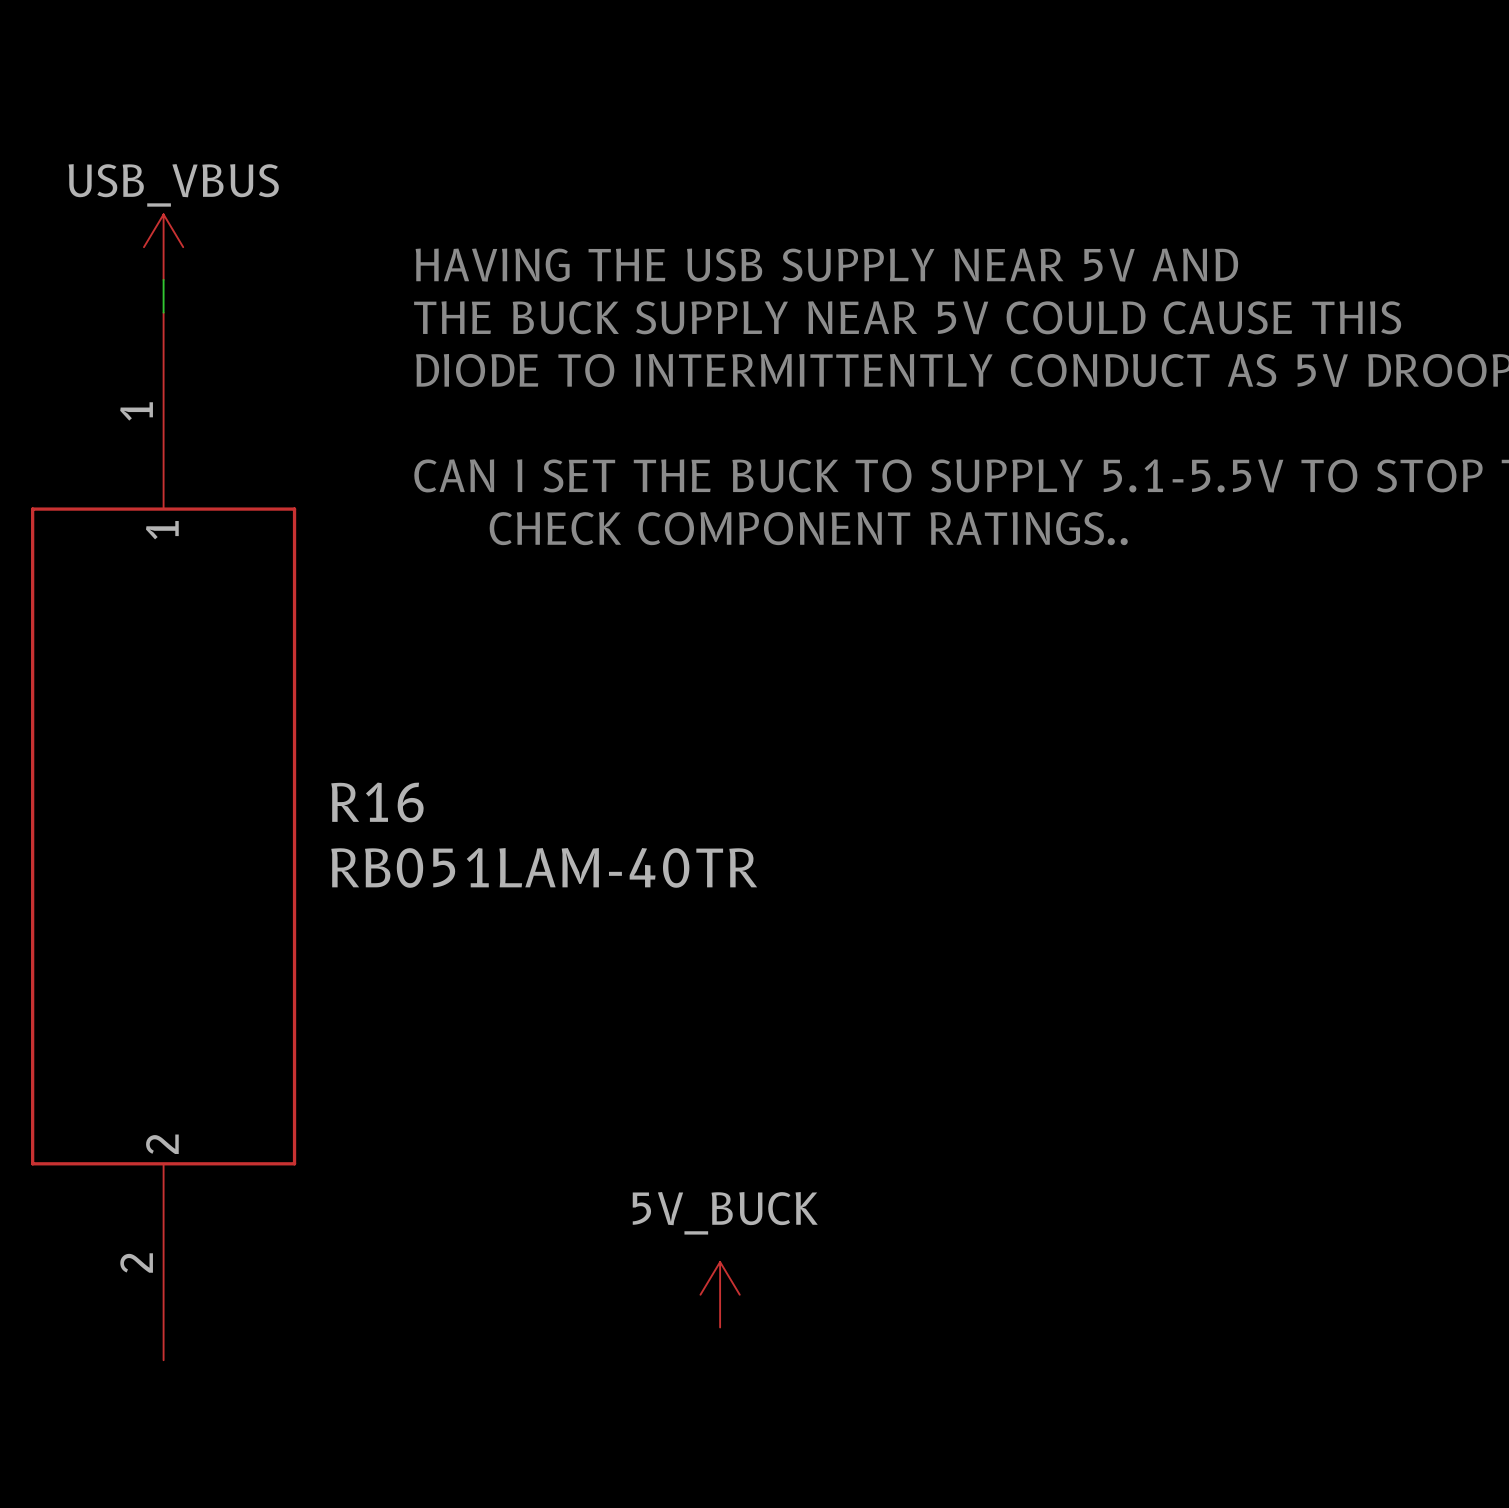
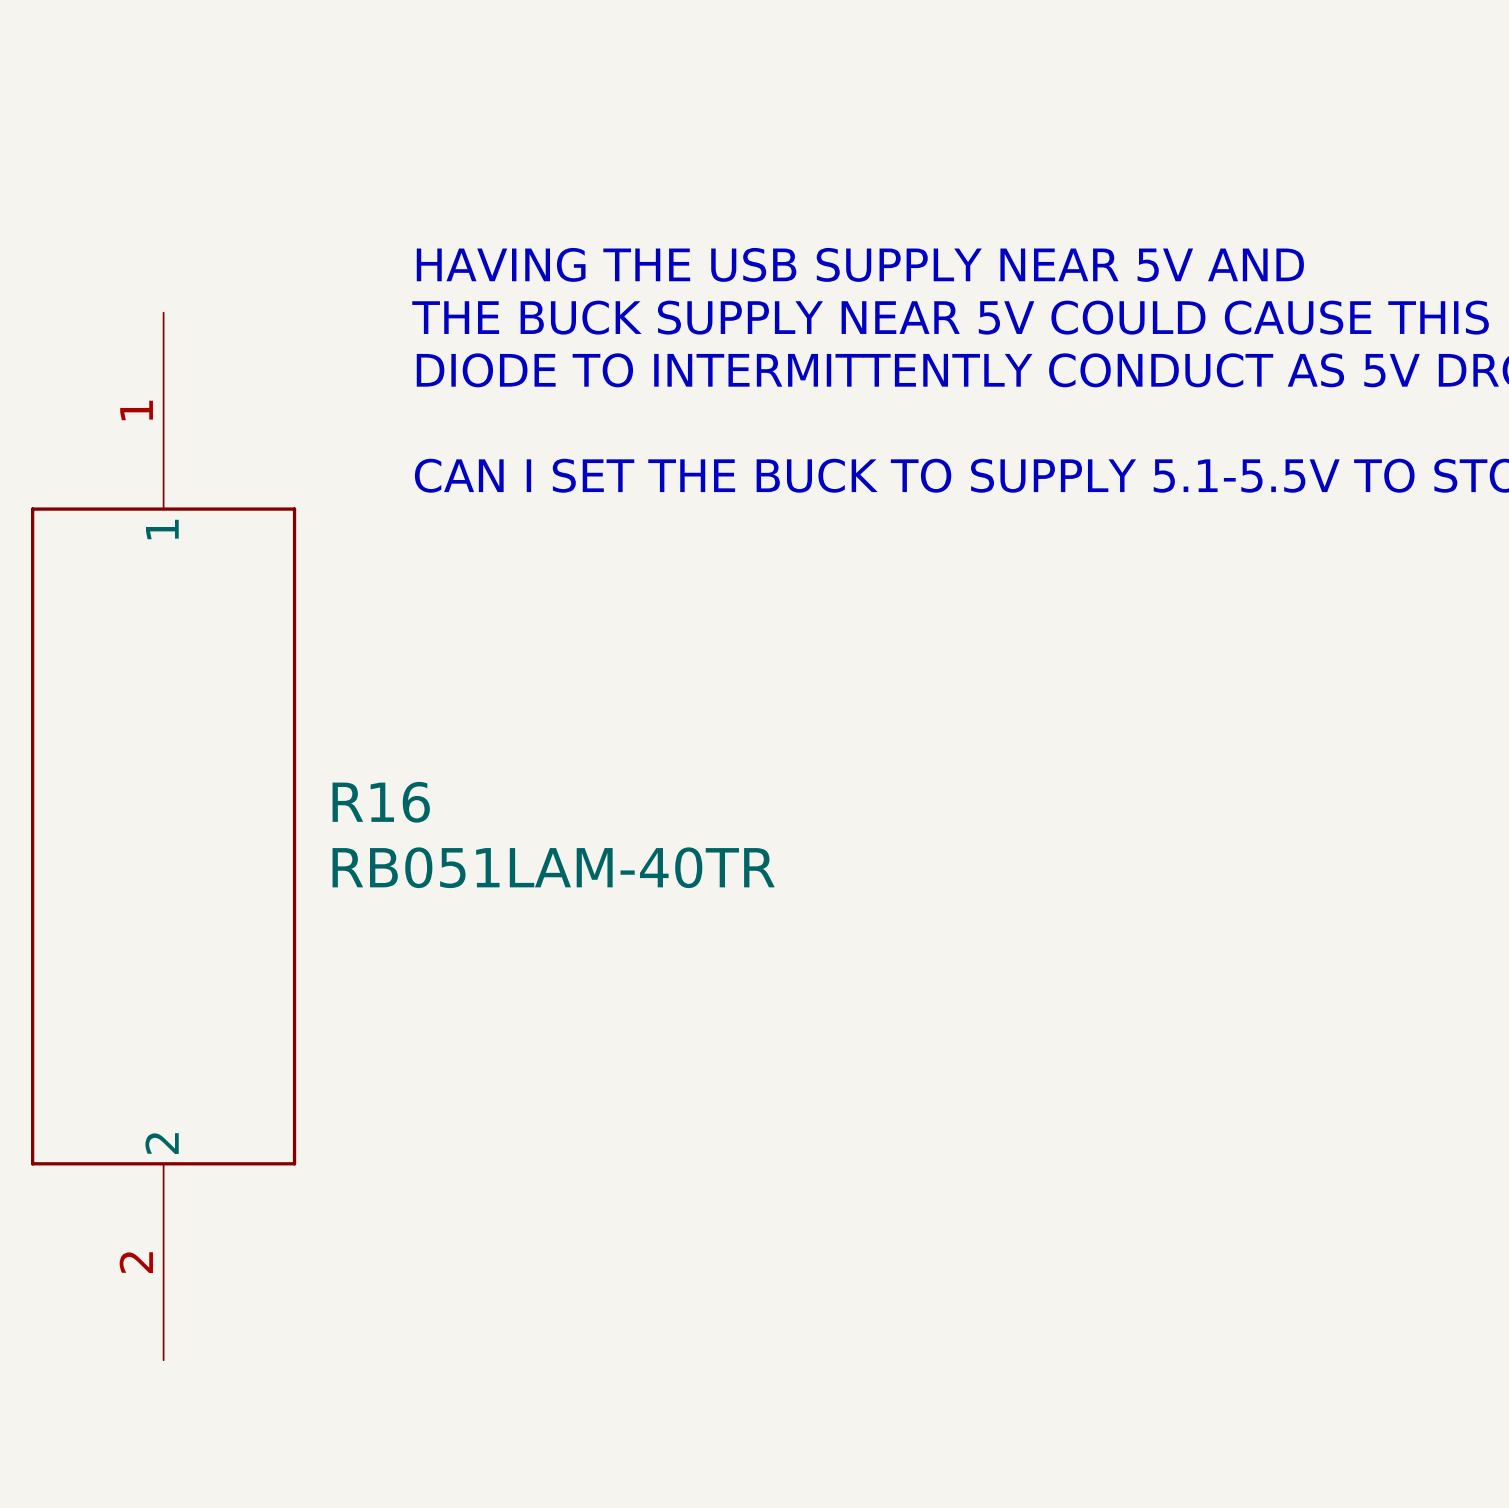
power symbol: USB_VBUS (163, 247) -> none
wire: (163, 279) (163, 312) -> none
text: CHECK COMPONENT RATINGS.. (808, 528) -> none
power symbol: 5V_BUCK (720, 1294) -> none

